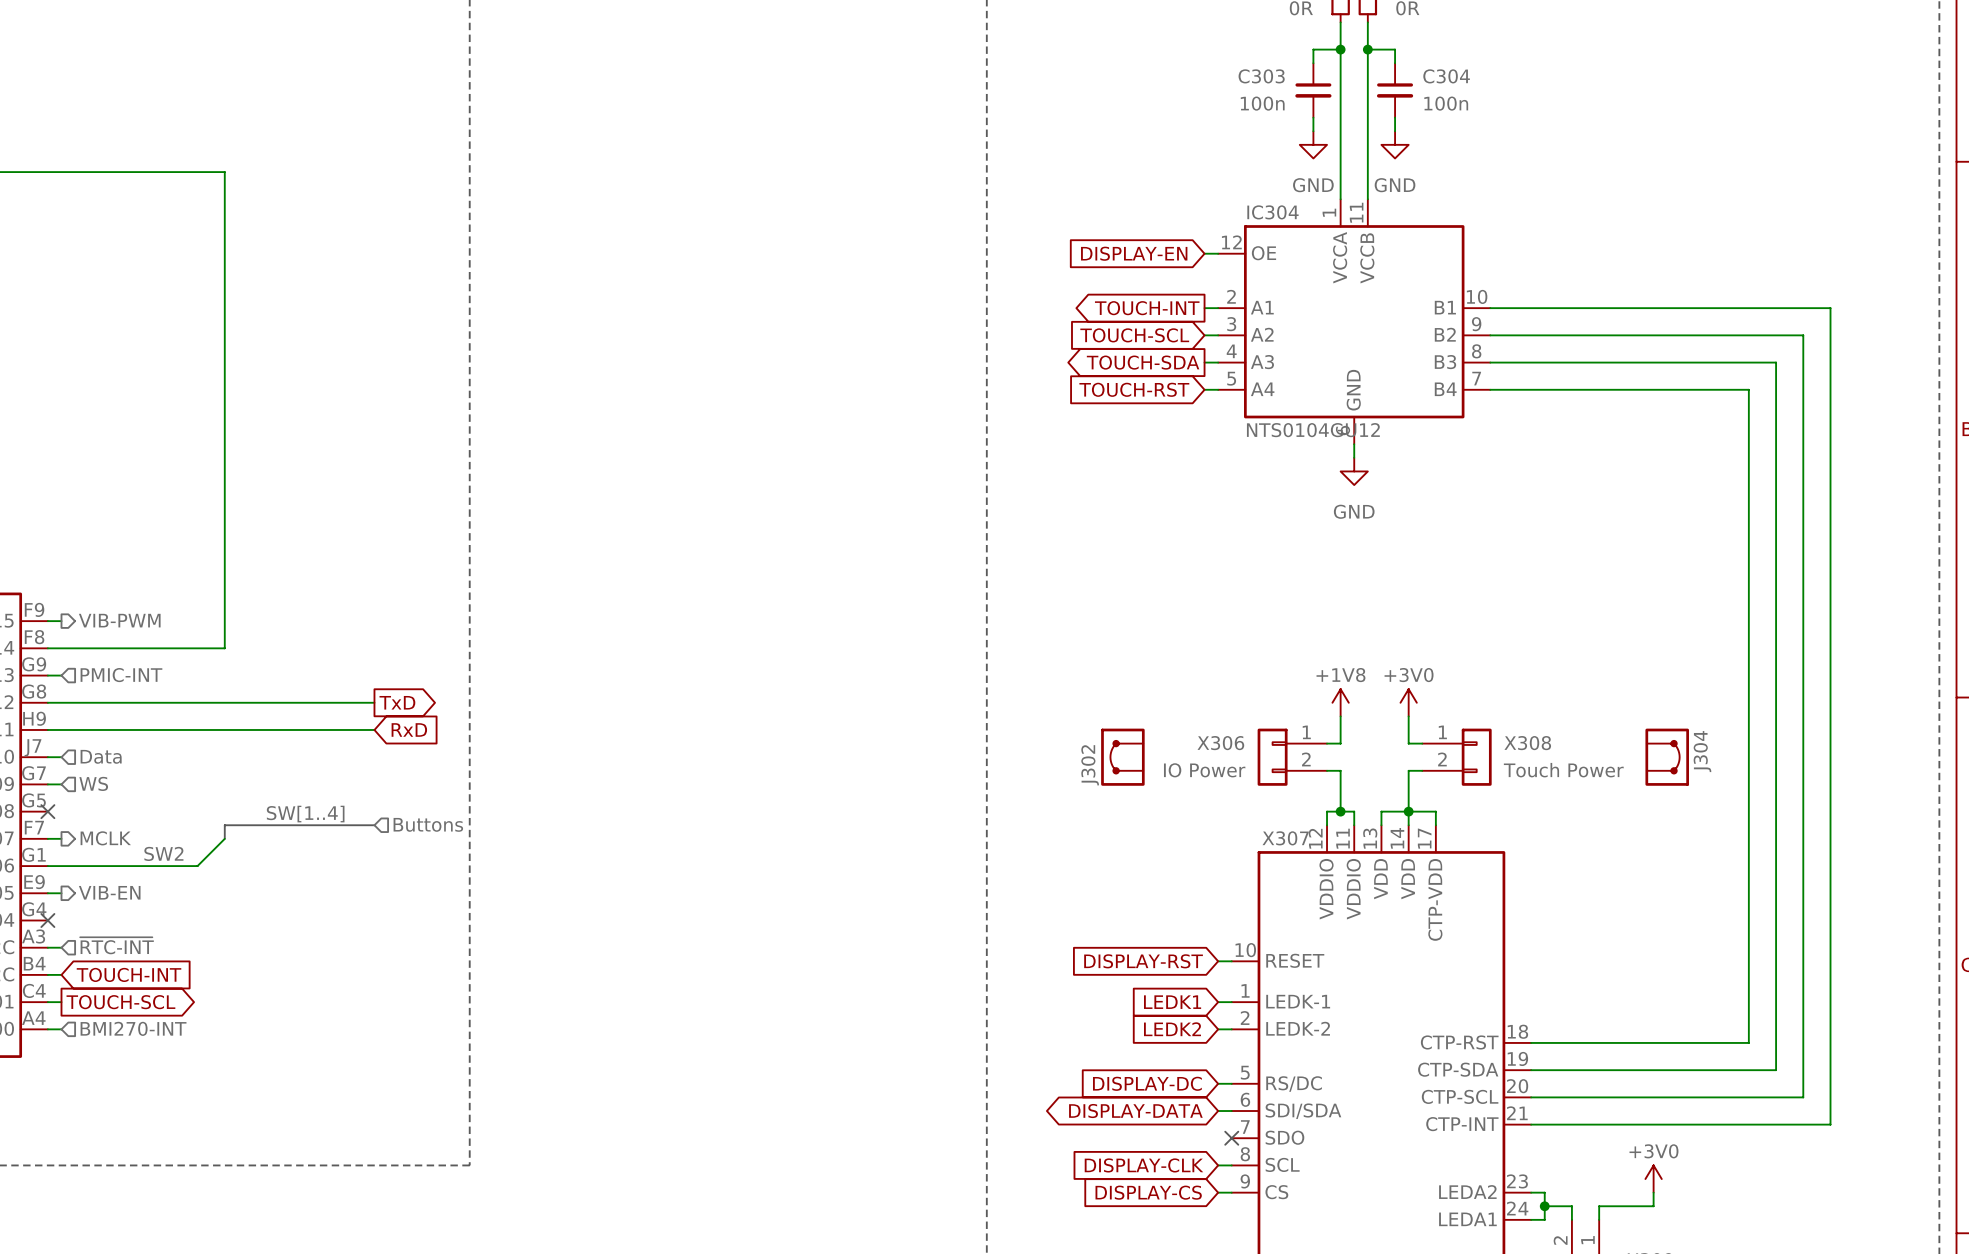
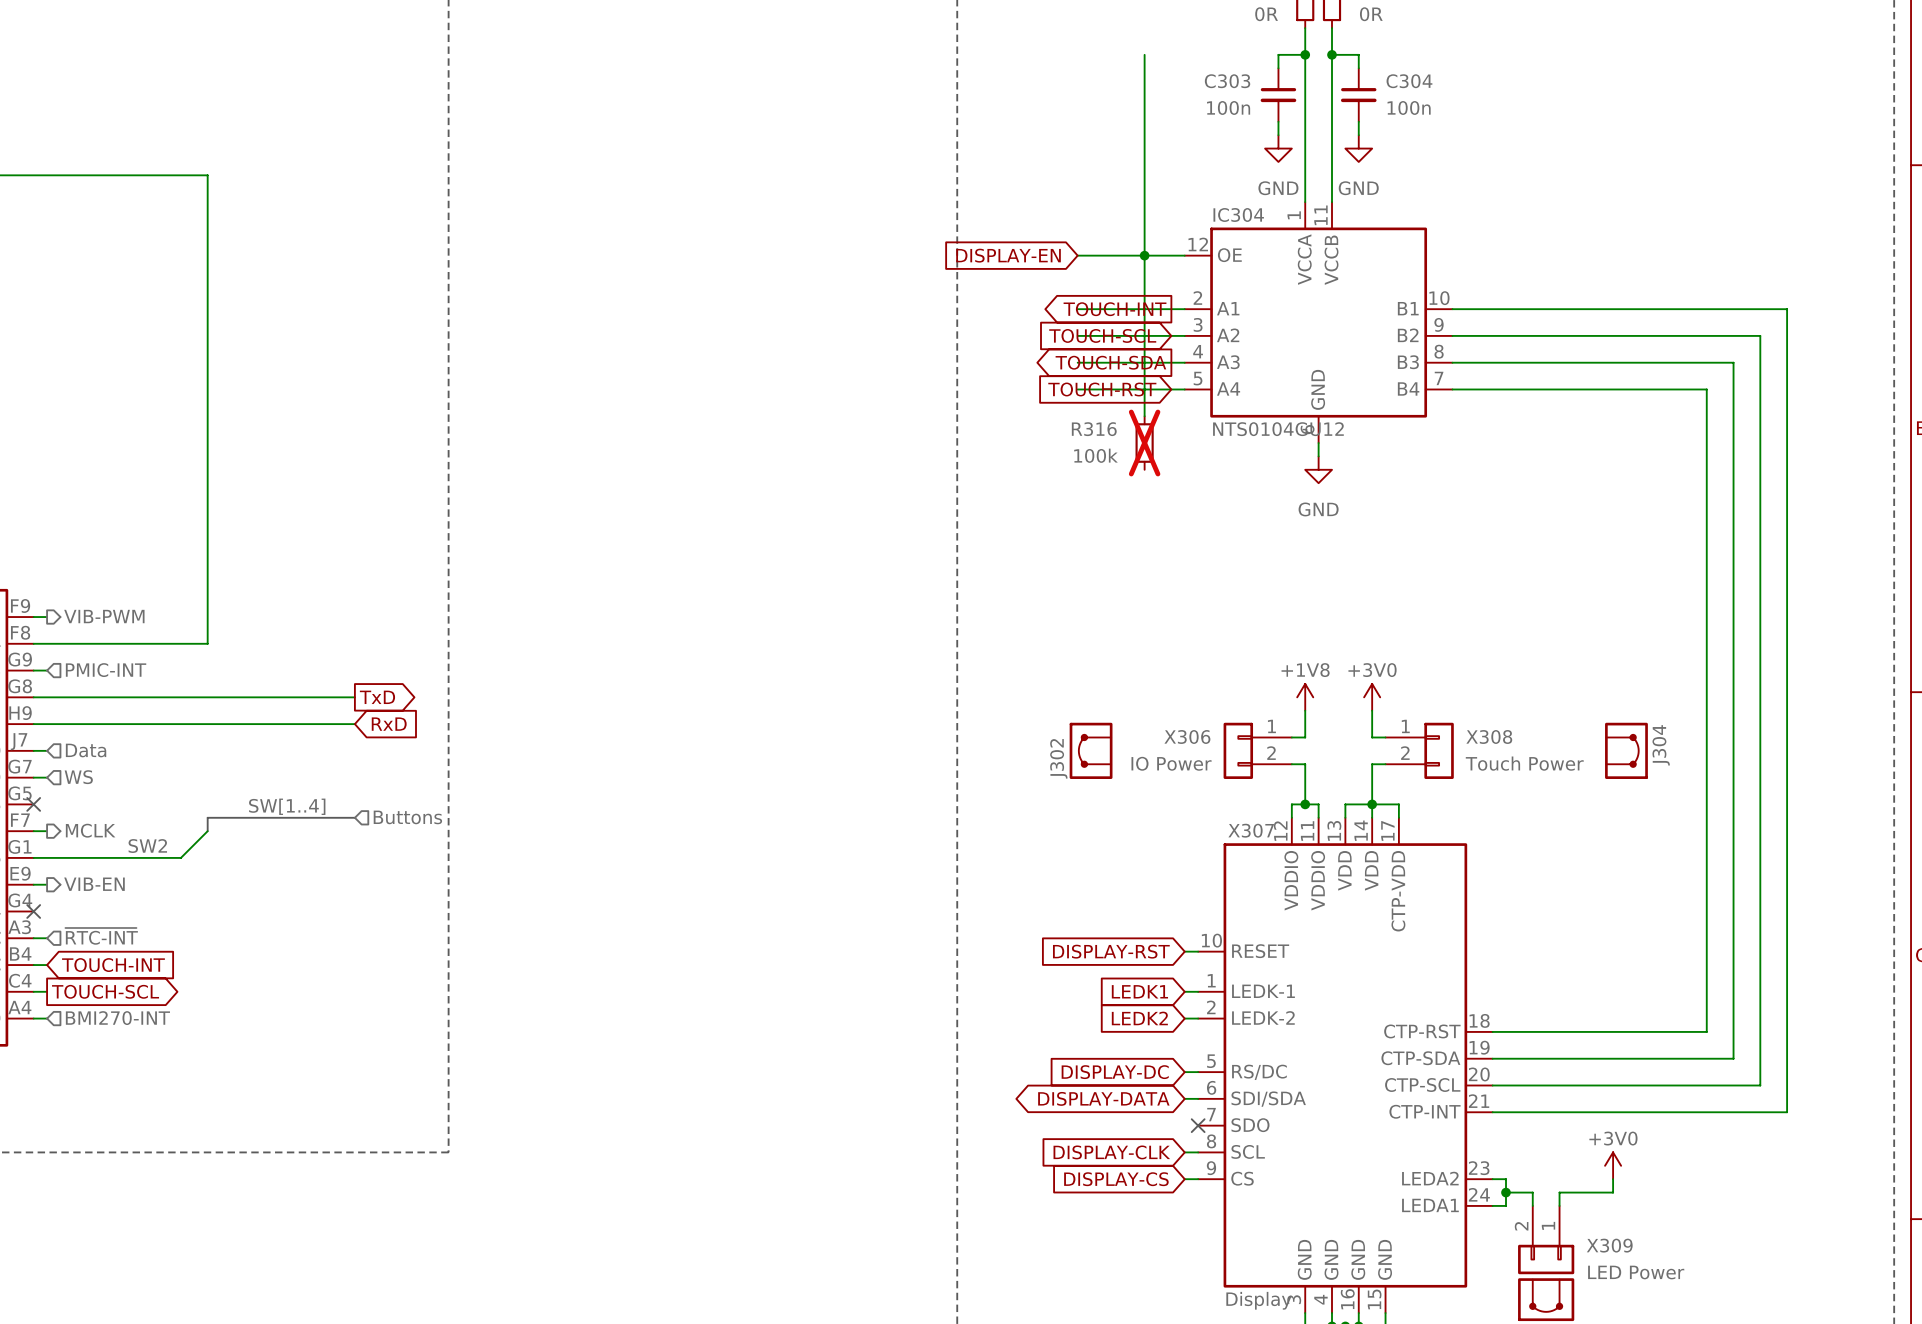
wire: none -> (1144, 54) (1144, 416)
wire: none -> (1077, 255) (1171, 255)
global label position: DISPLAY-EN (1134, 253) -> DISPLAY-EN (1008, 255)
junction: none -> (1144, 255)
wire: none -> (1077, 309) (1171, 309)
wire: none -> (1077, 335) (1171, 335)
wire: none -> (1077, 362) (1171, 362)
wire: none -> (1077, 389) (1171, 389)
R316: none -> 100k (1144, 443)

